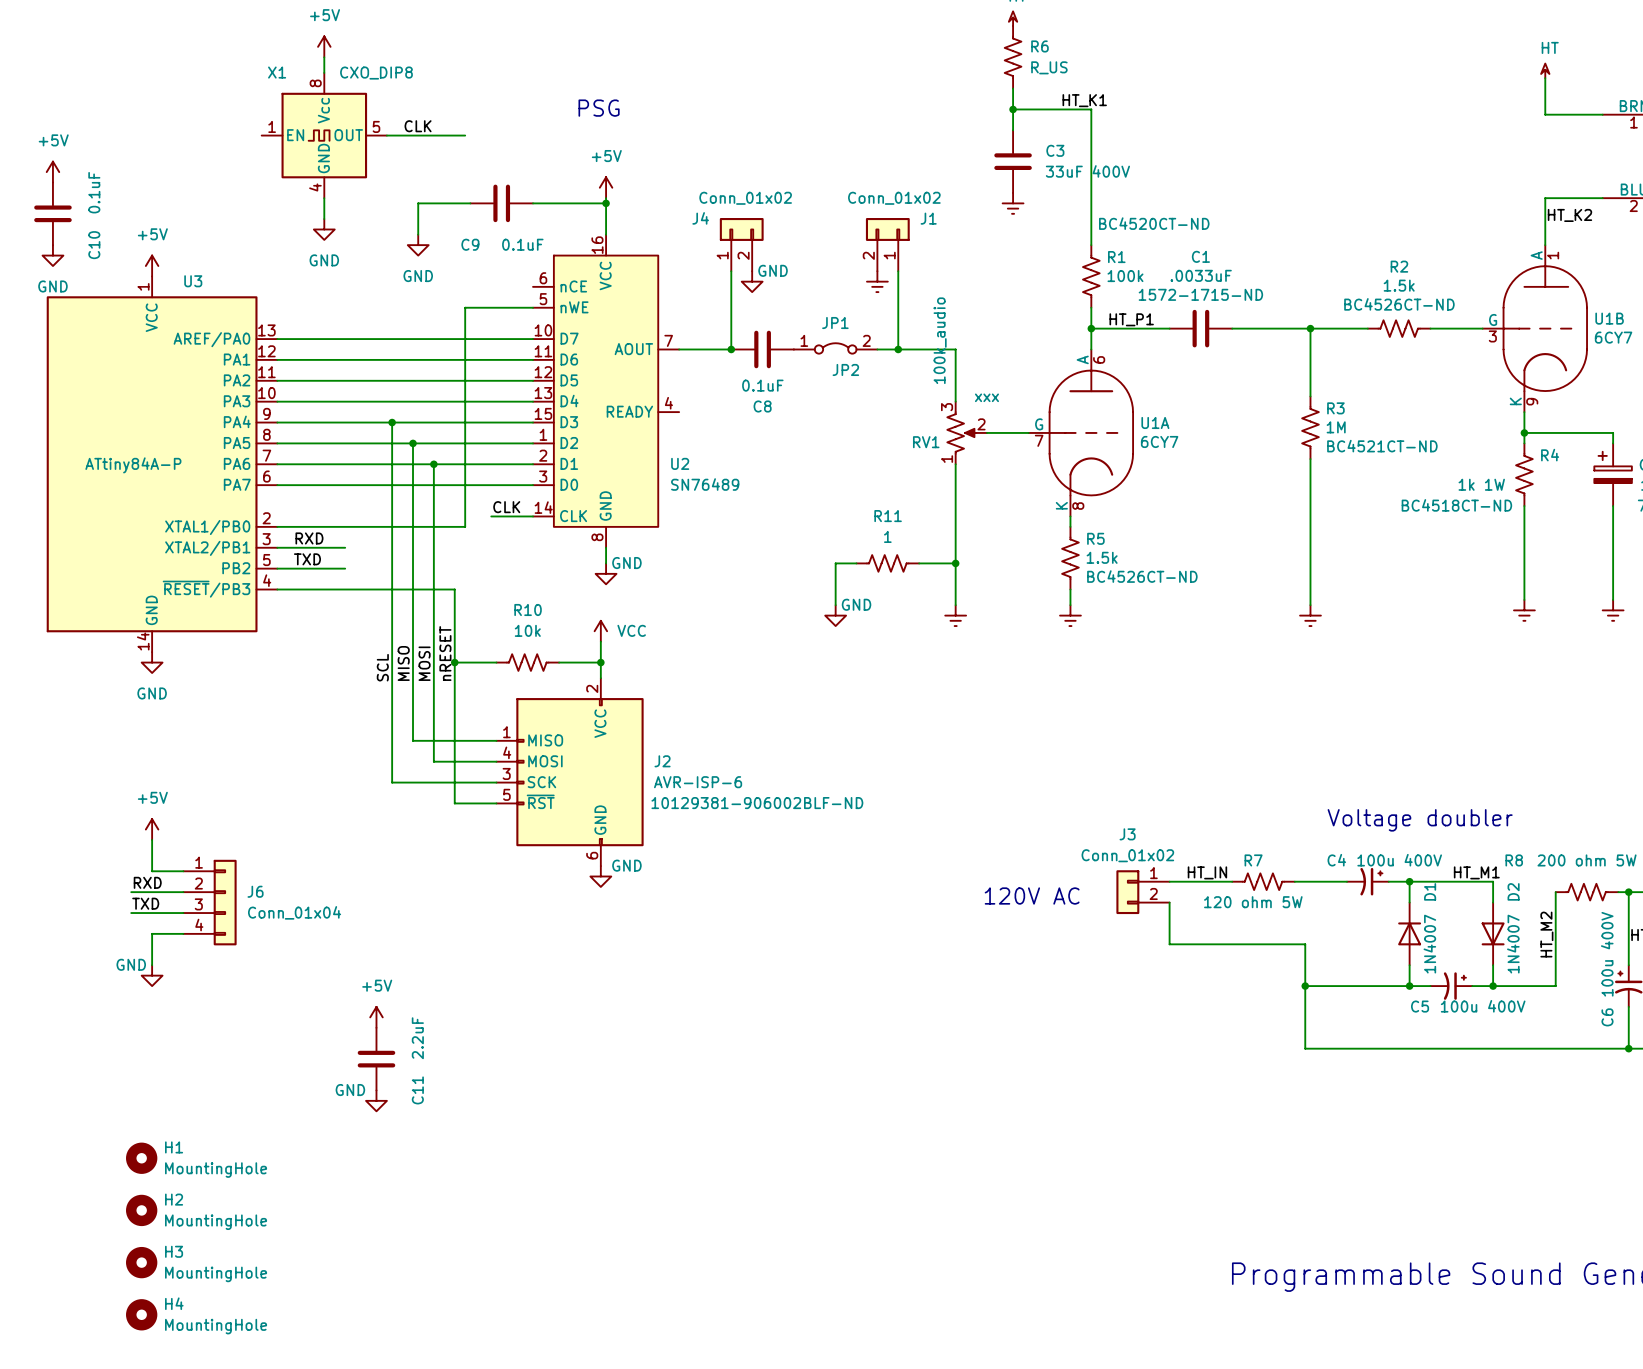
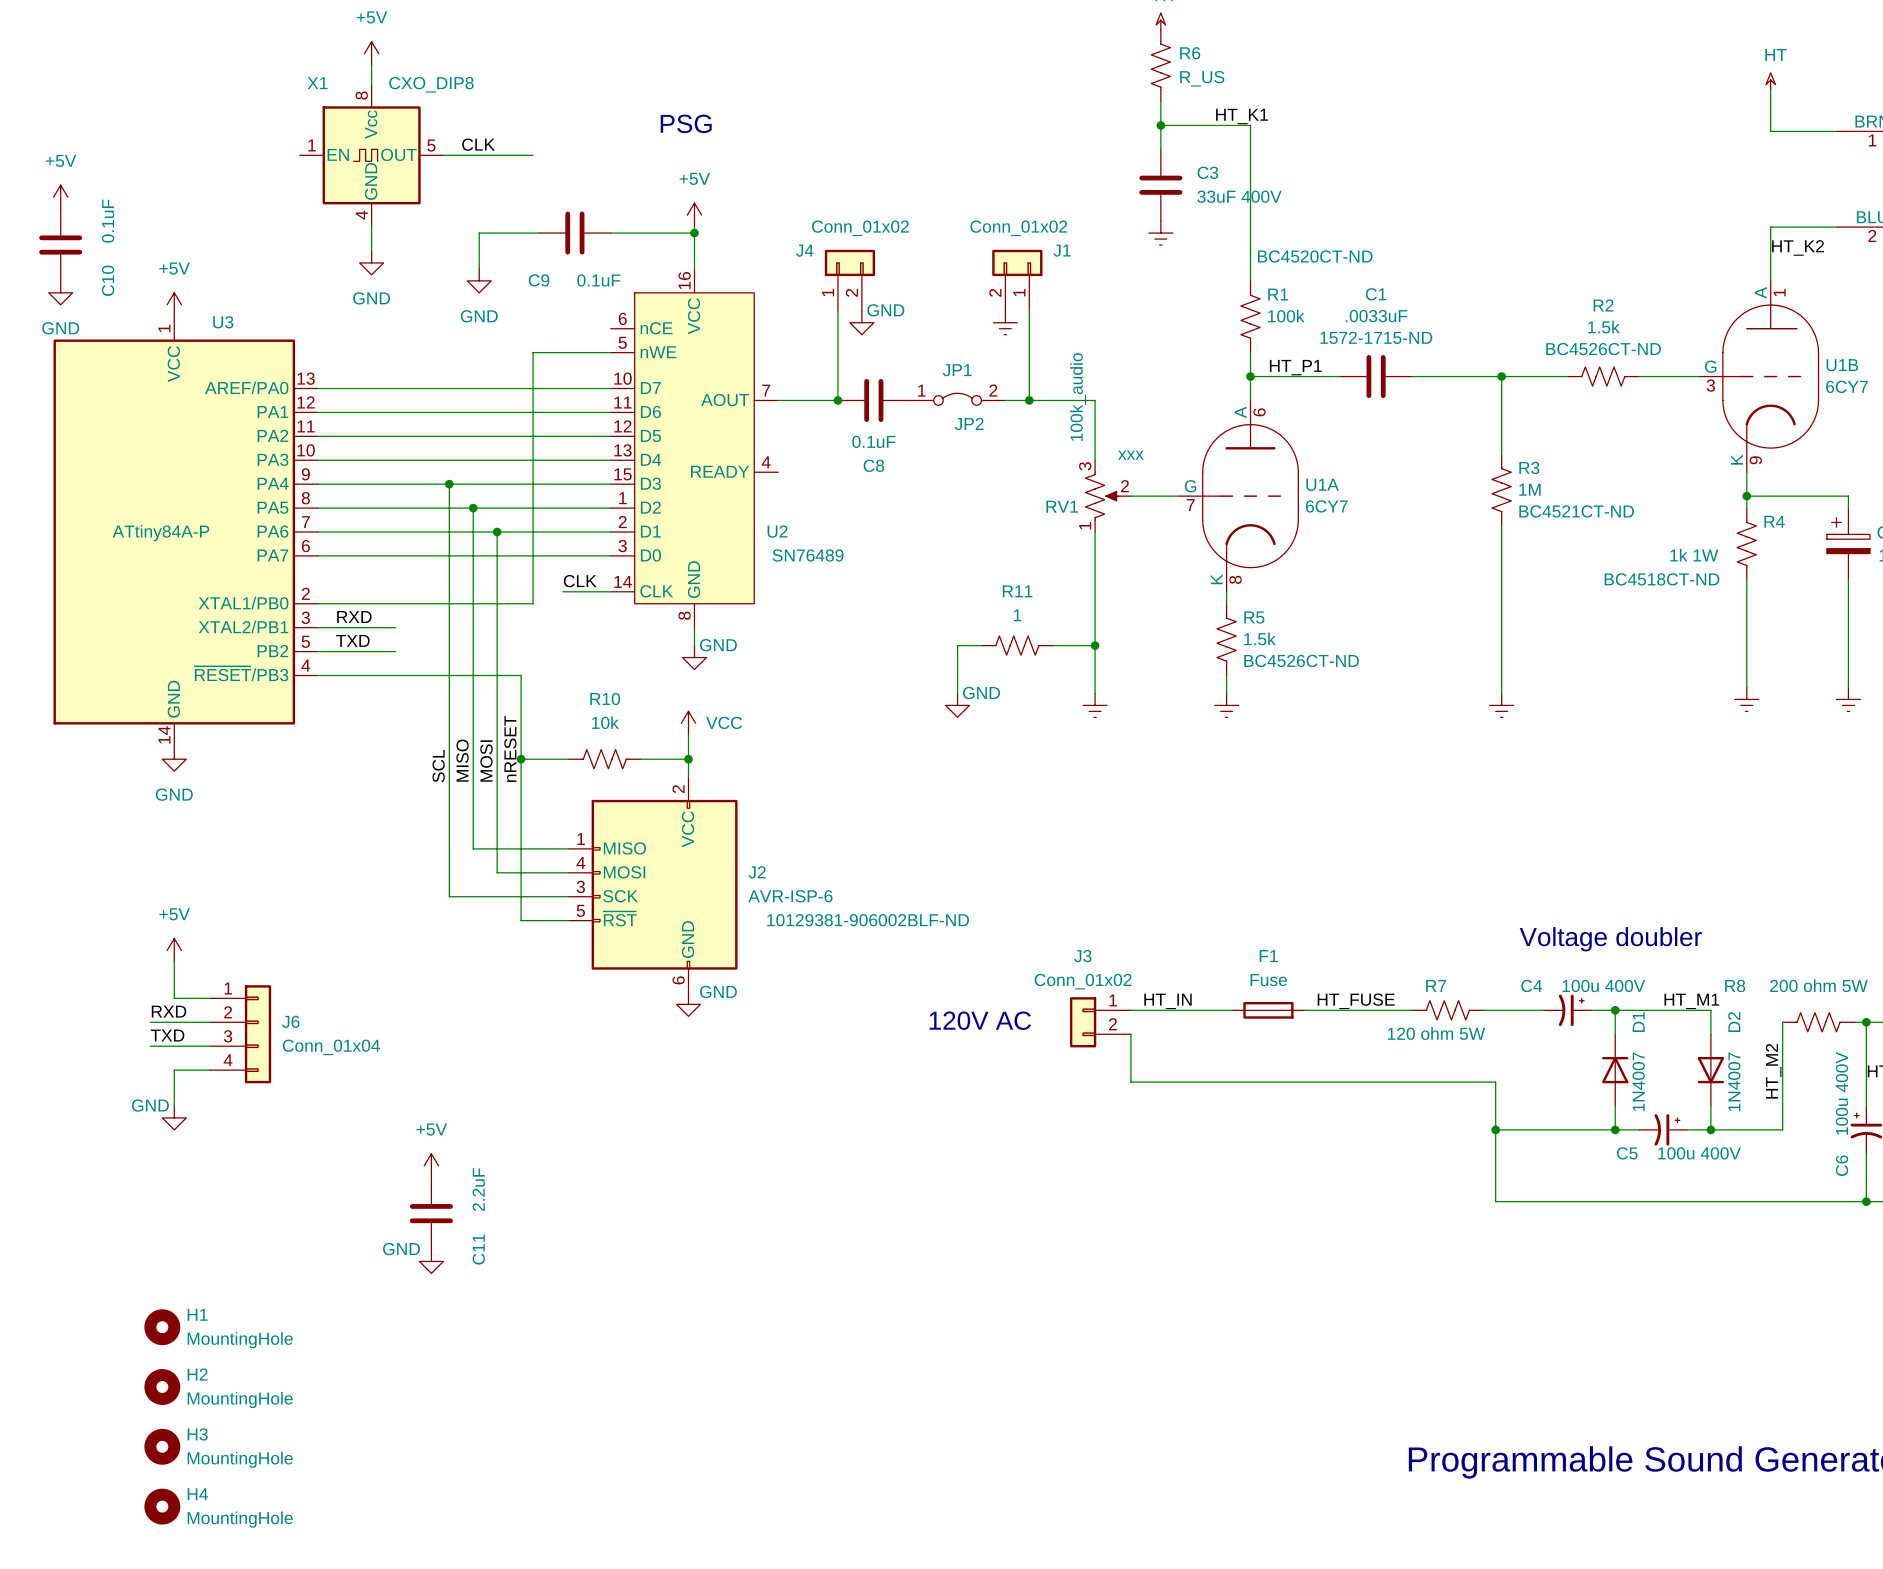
label: none -> HT_FUSE (1356, 1001)
label position: HT_IN (1207, 872) -> HT_IN (1168, 1001)
wire: none -> (1130, 1010) (1232, 1010)
F1: none -> Fuse (1268, 1010)
J3 position: (1142, 892) -> (1100, 1022)
text position: 120V AC (1032, 896) -> 120V AC (980, 1020)
wire: (1169, 902) (1169, 944) -> (1130, 1034) (1130, 1082) (1340, 1082)

